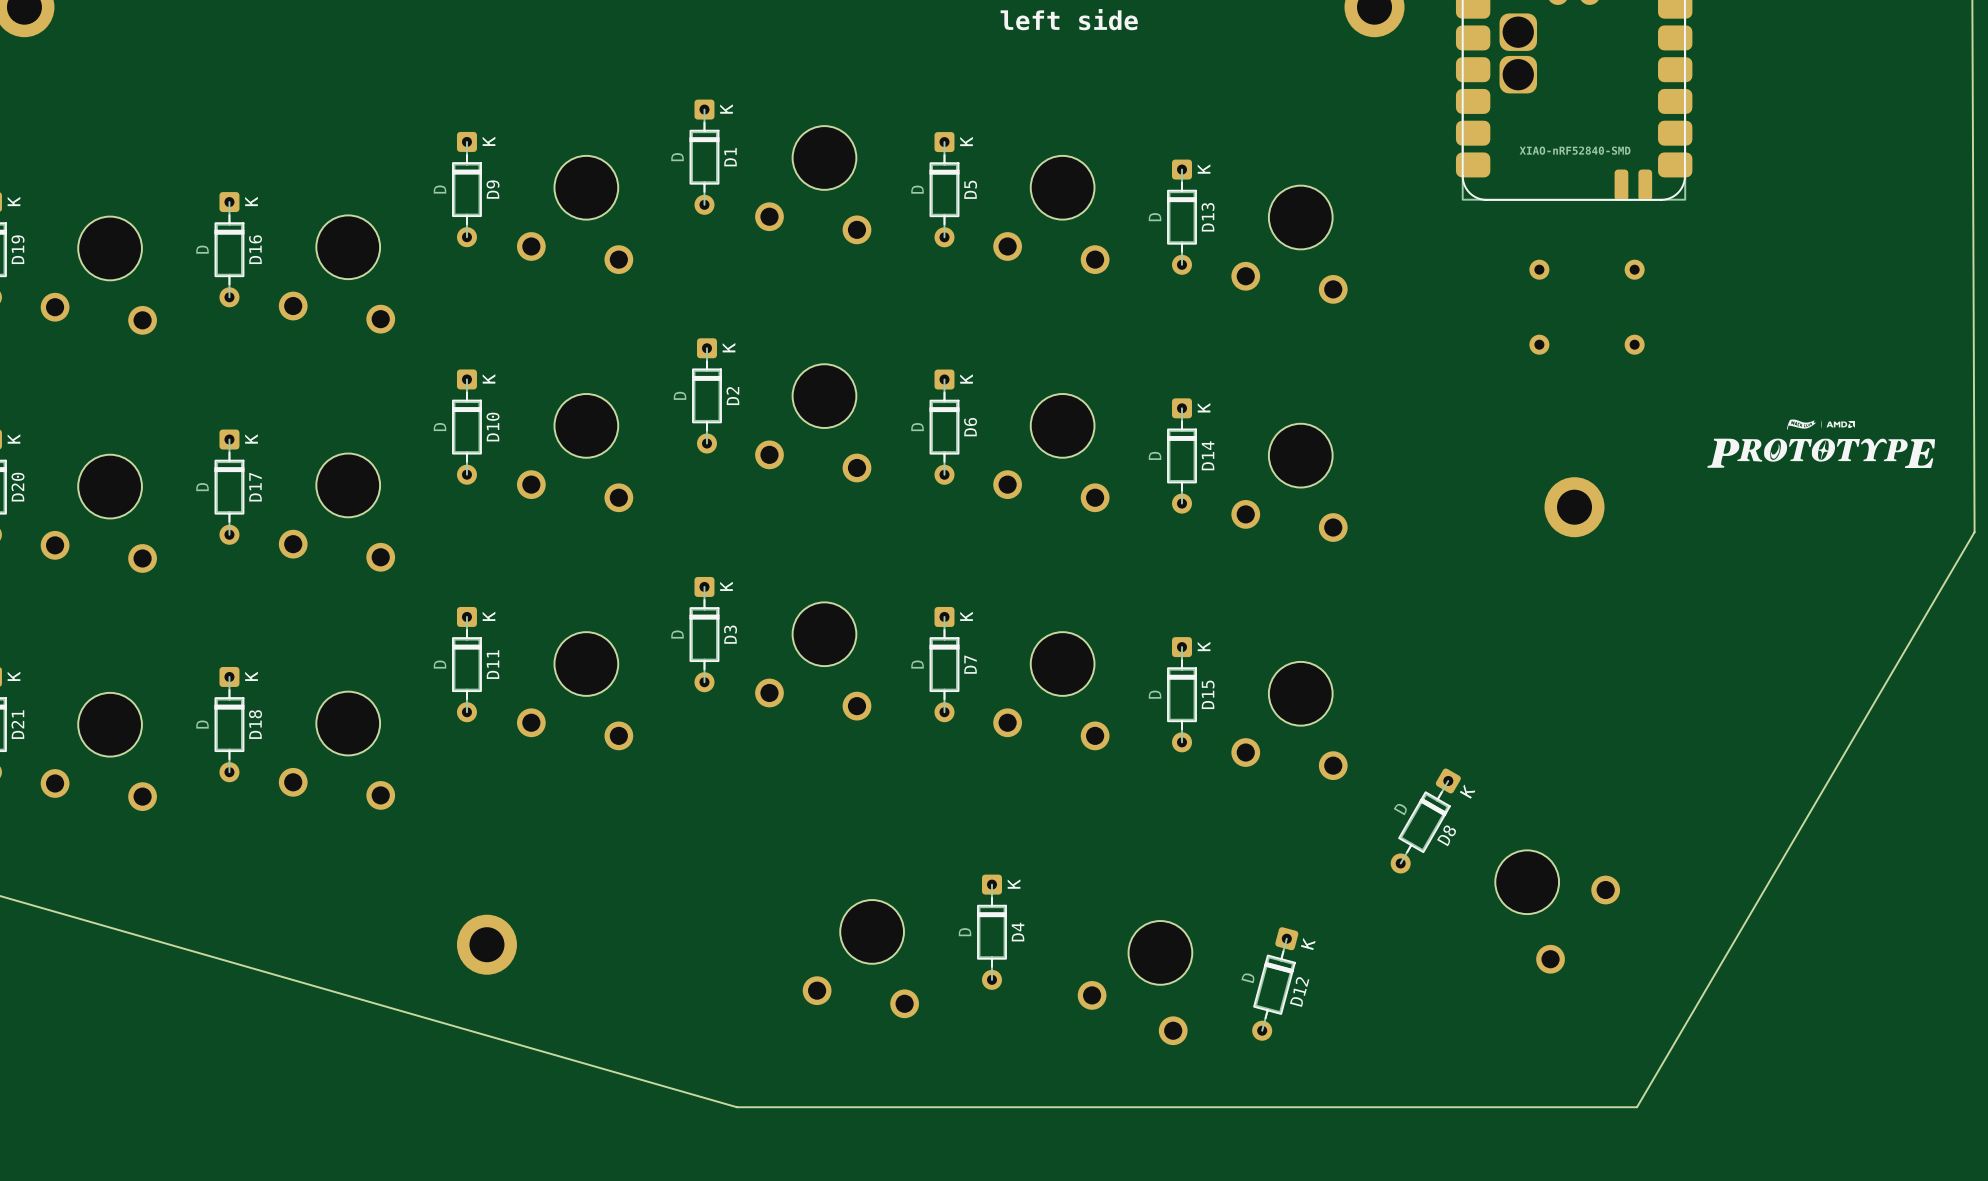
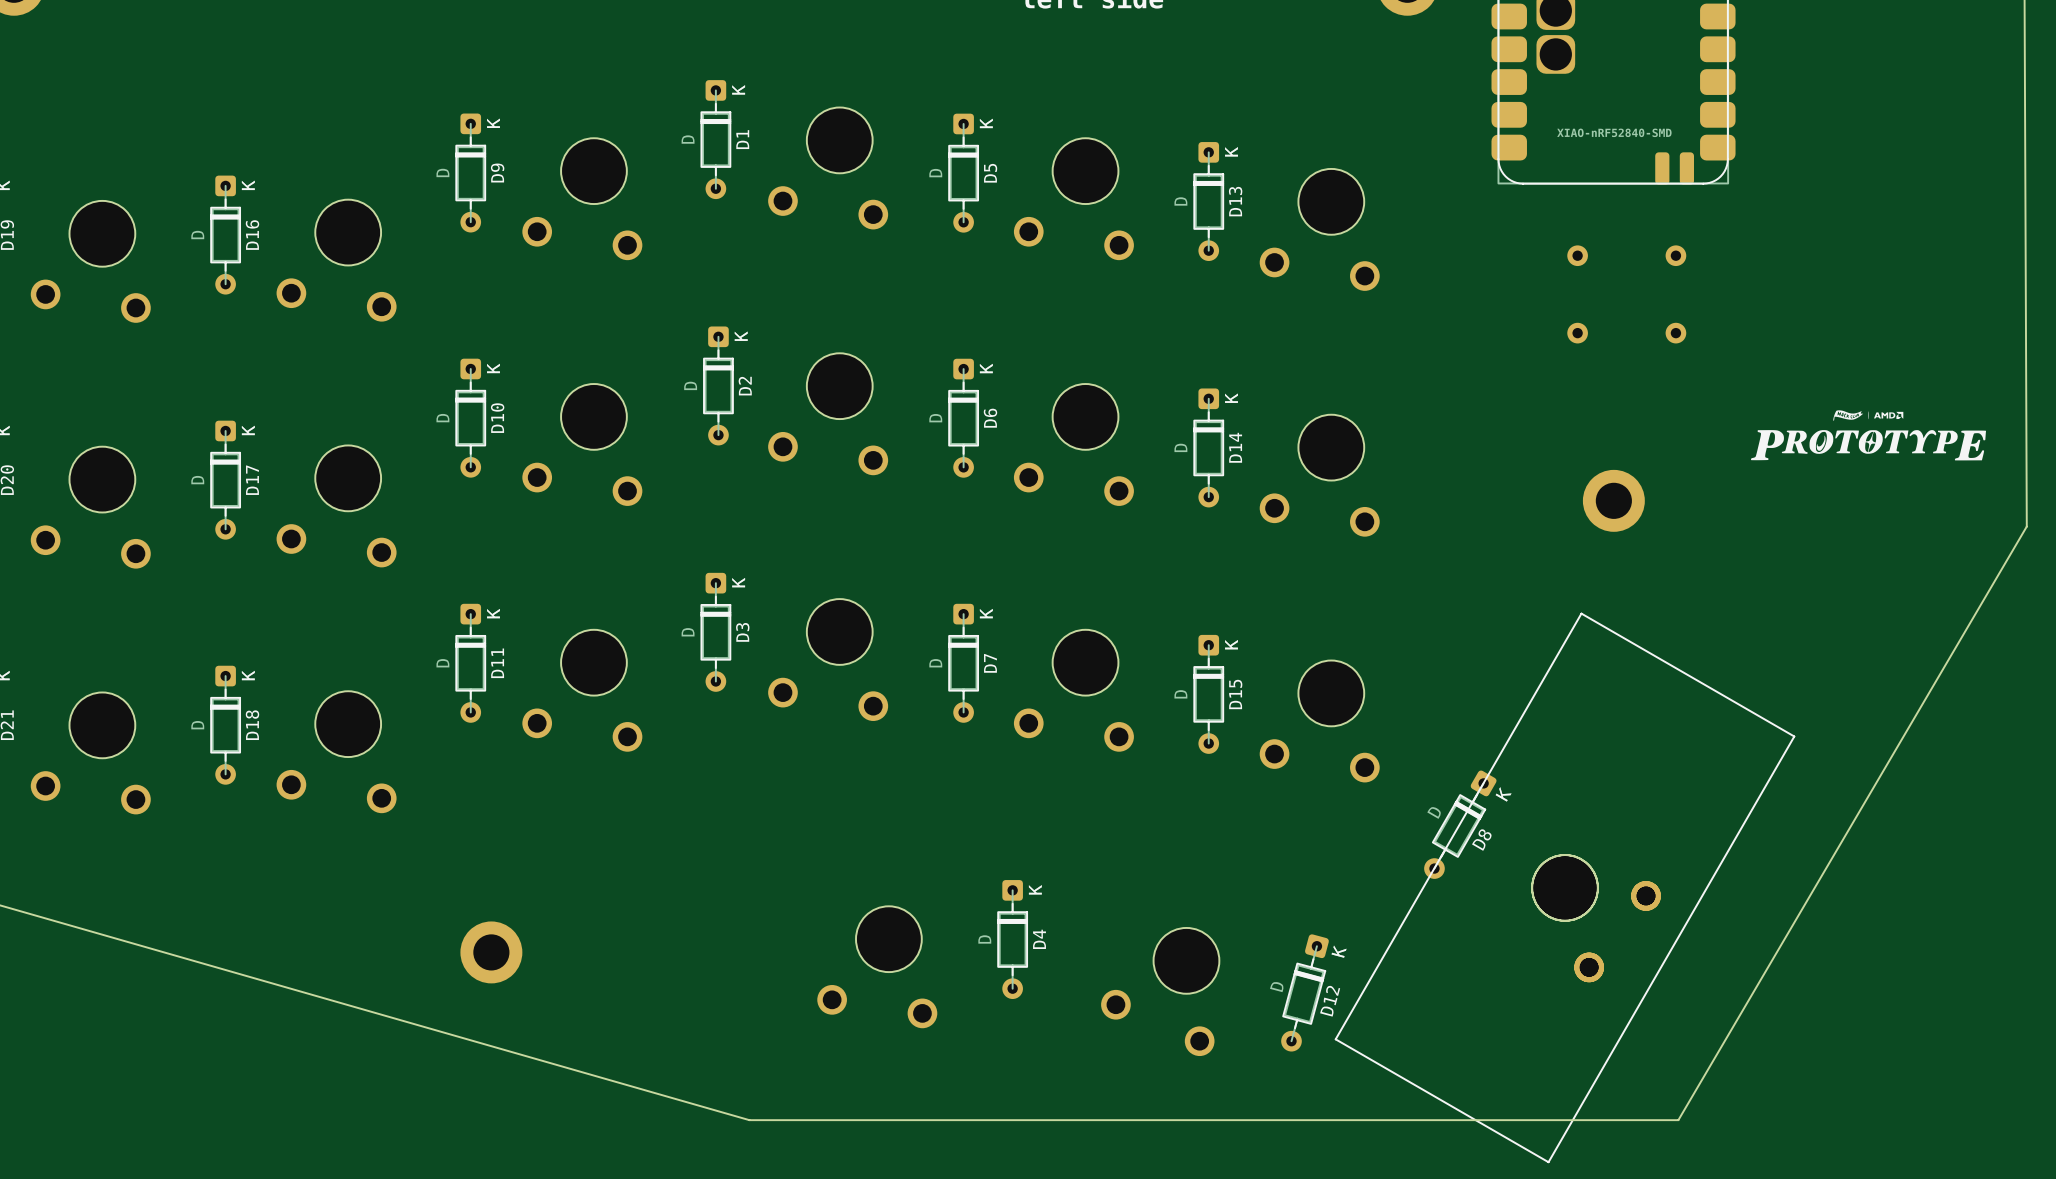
part: none -> (1565, 887)

